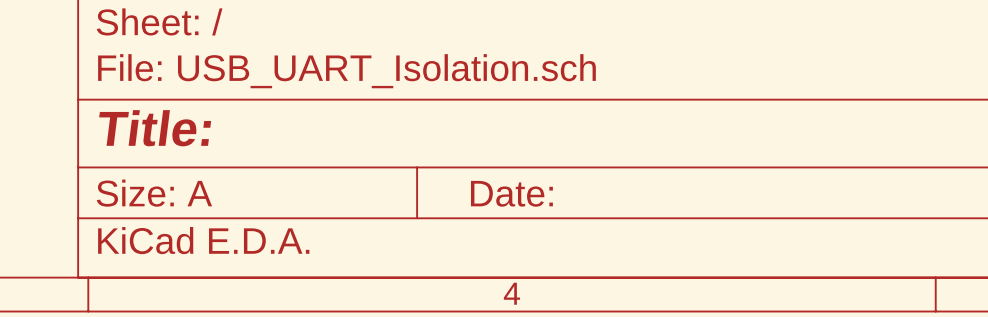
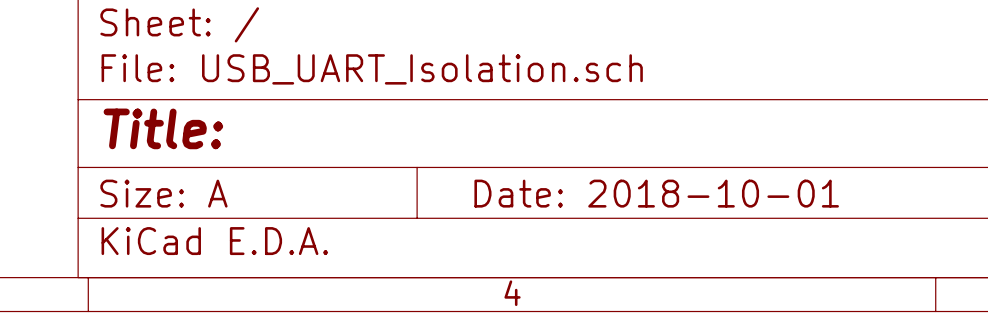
title block: Date: (511, 193) -> Date: 2018-10-01 (656, 193)

